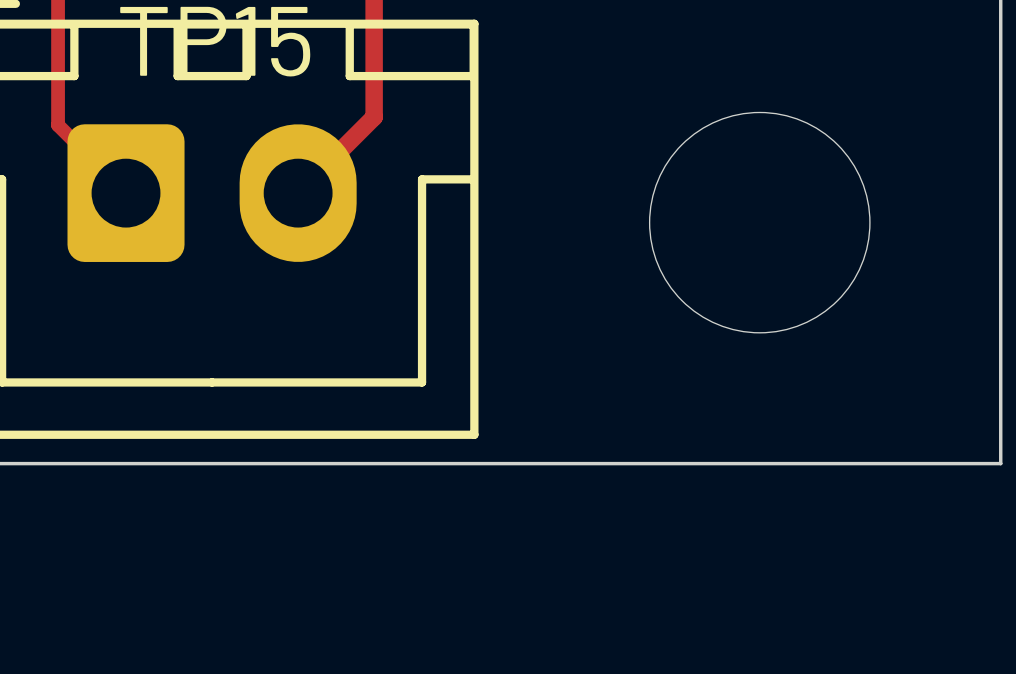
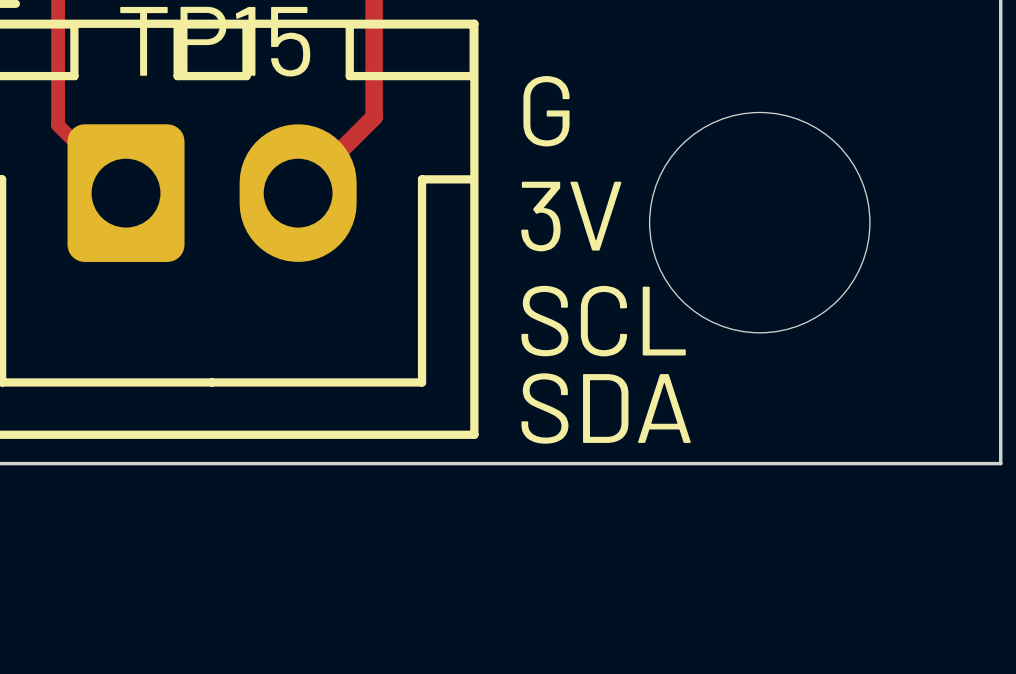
text: none -> G (546, 111)
text: none -> 3V (571, 216)
text: none -> SCL (603, 321)
text: none -> SDA (606, 408)

